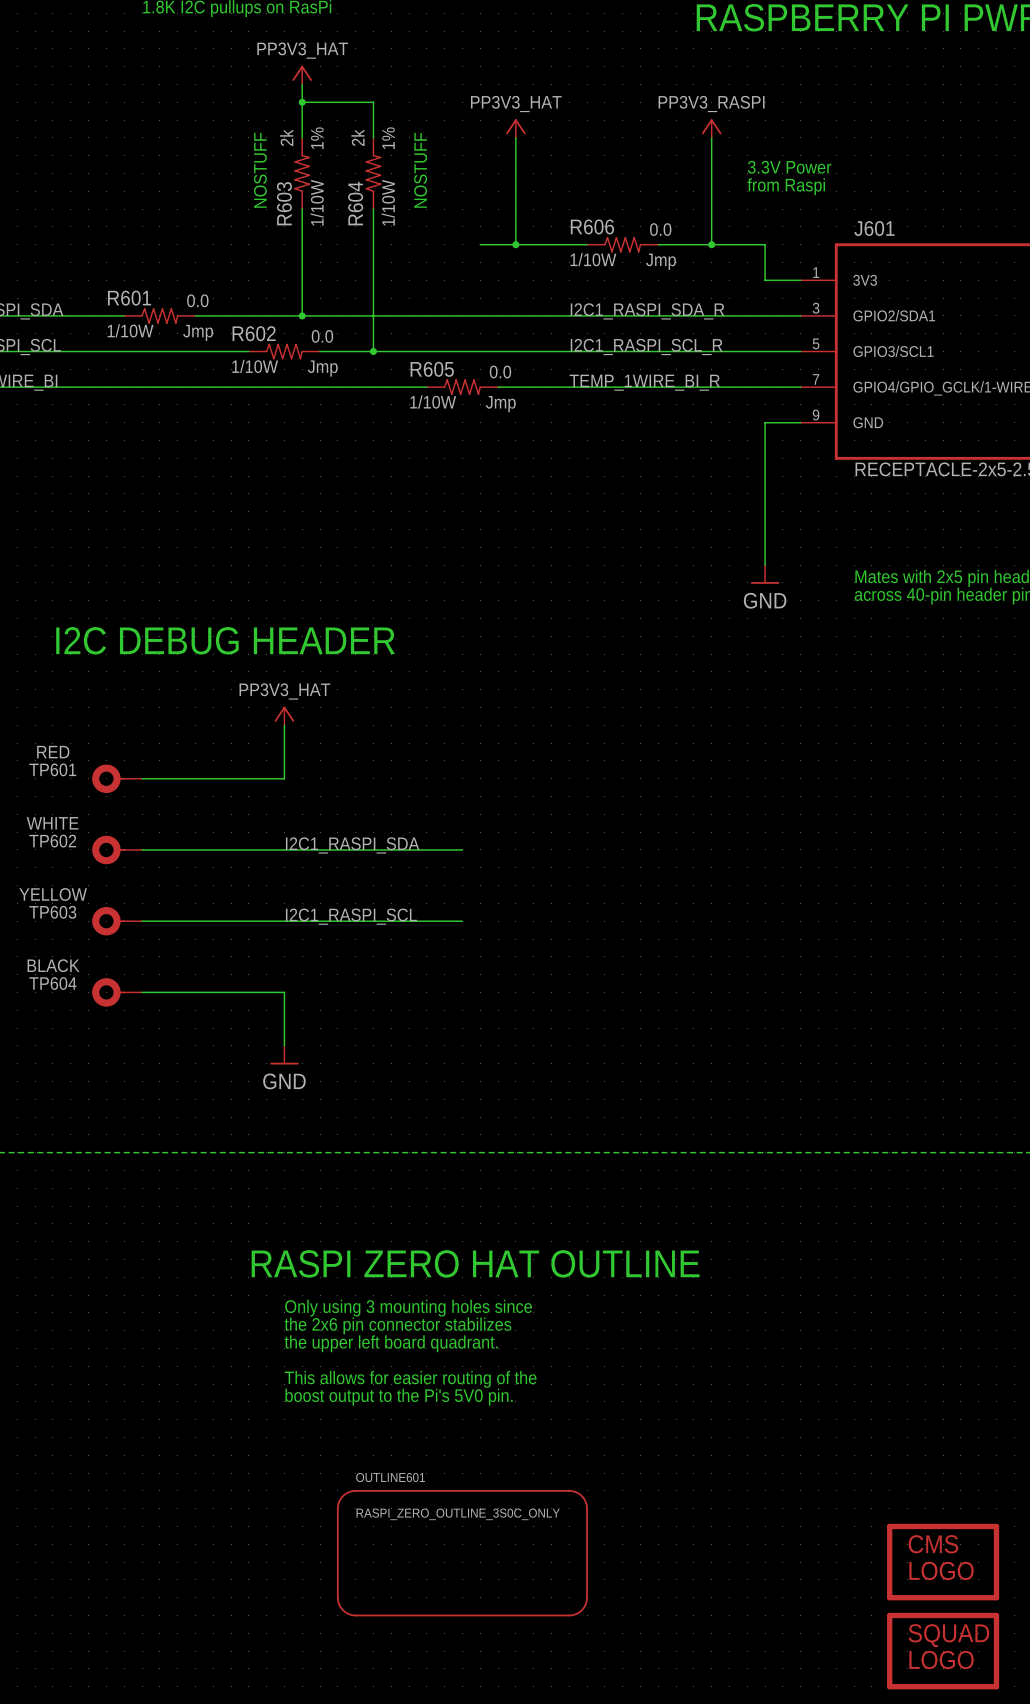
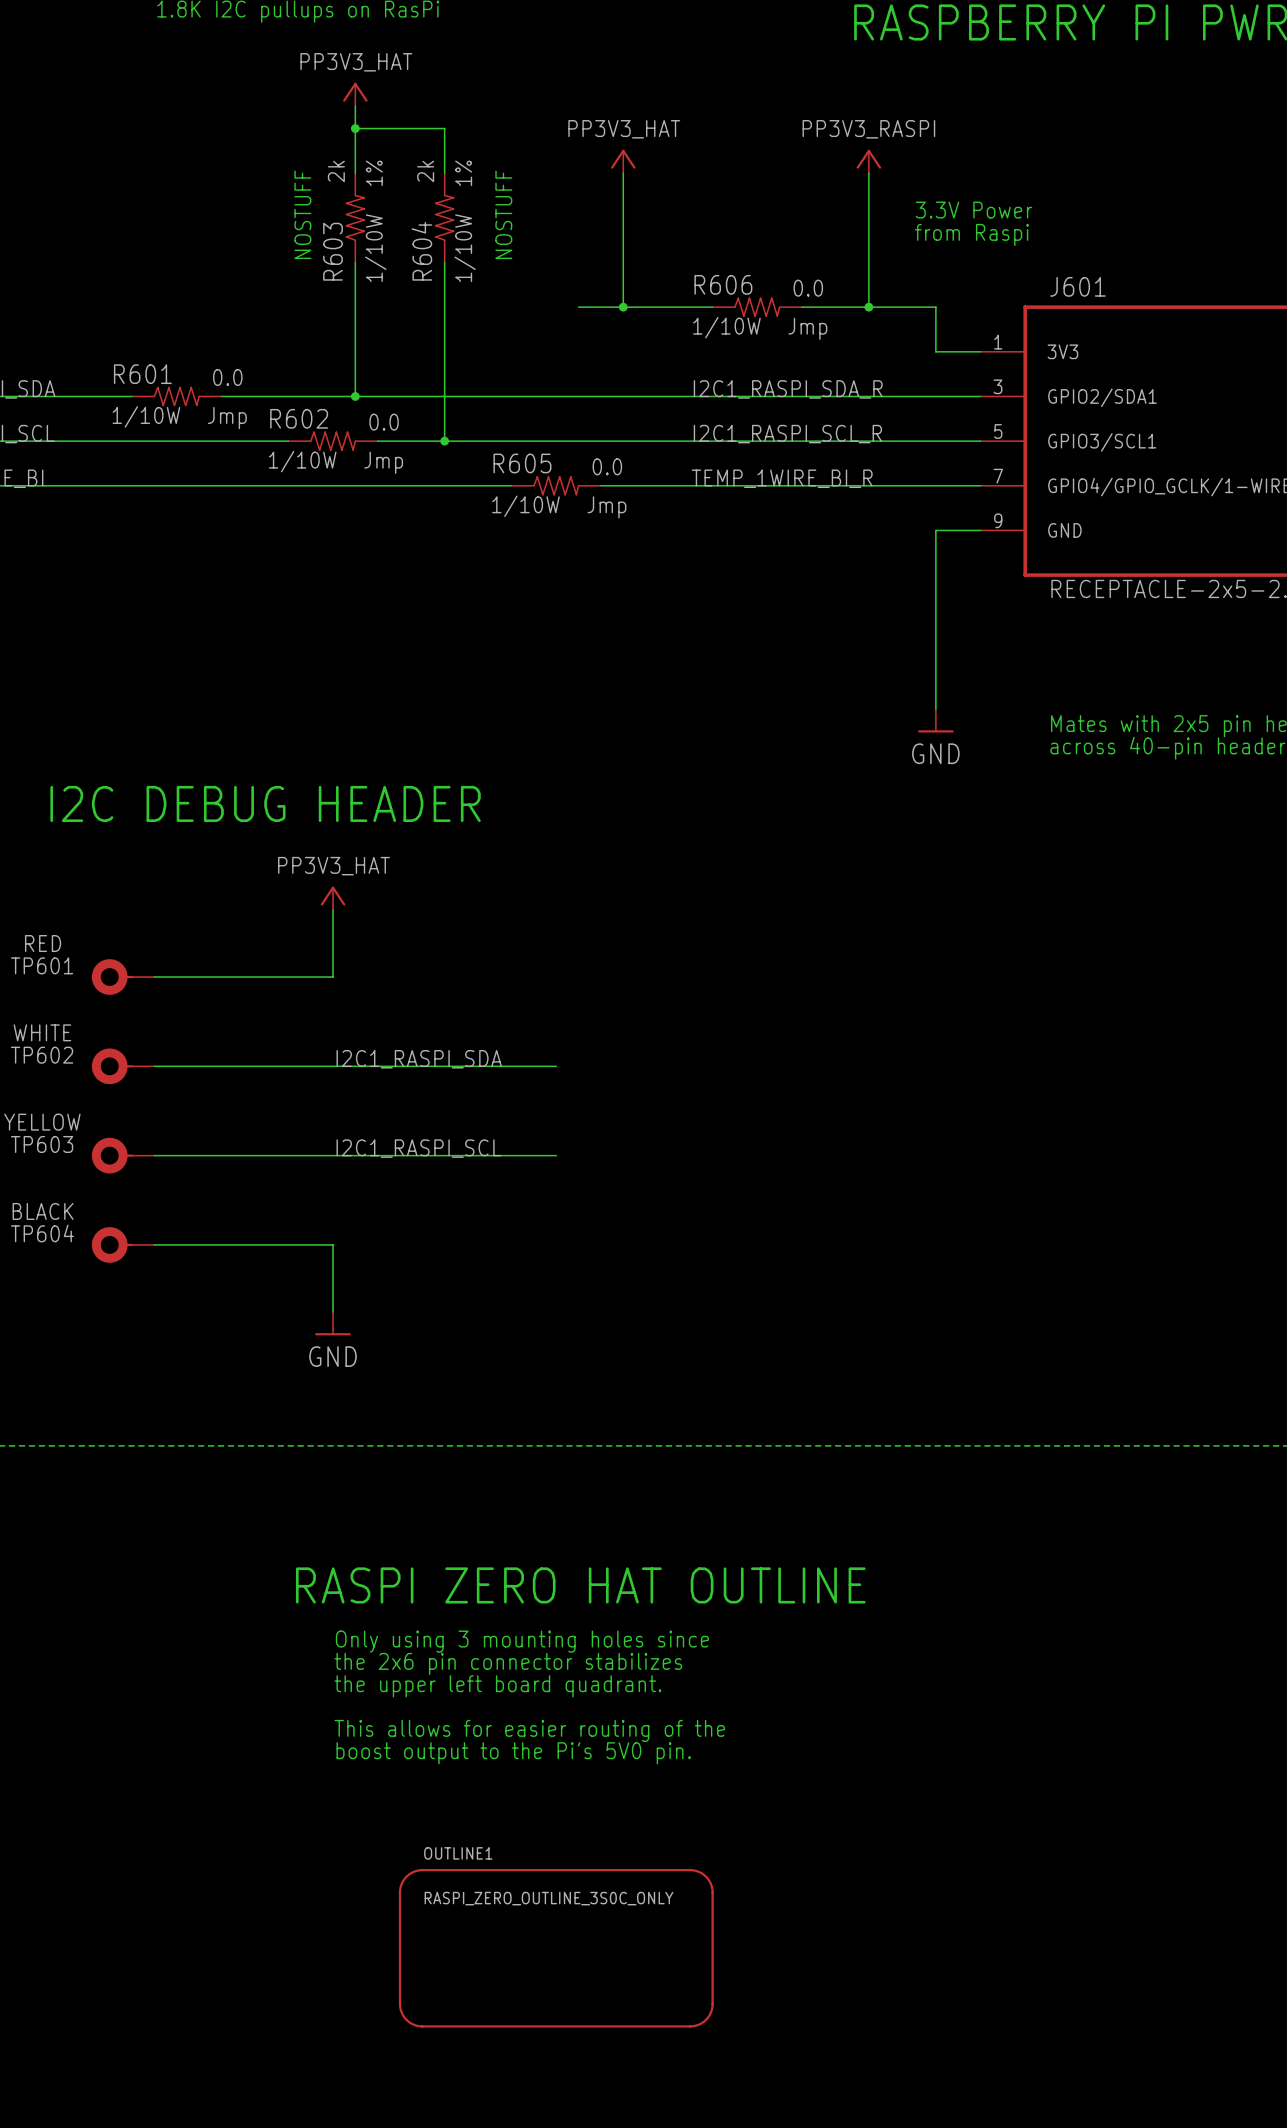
OUTLINE601 name: OUTLINE601 (390, 1477) -> OUTLINE1 (458, 1853)
part: (943, 1562) -> none
part: (943, 1651) -> none

